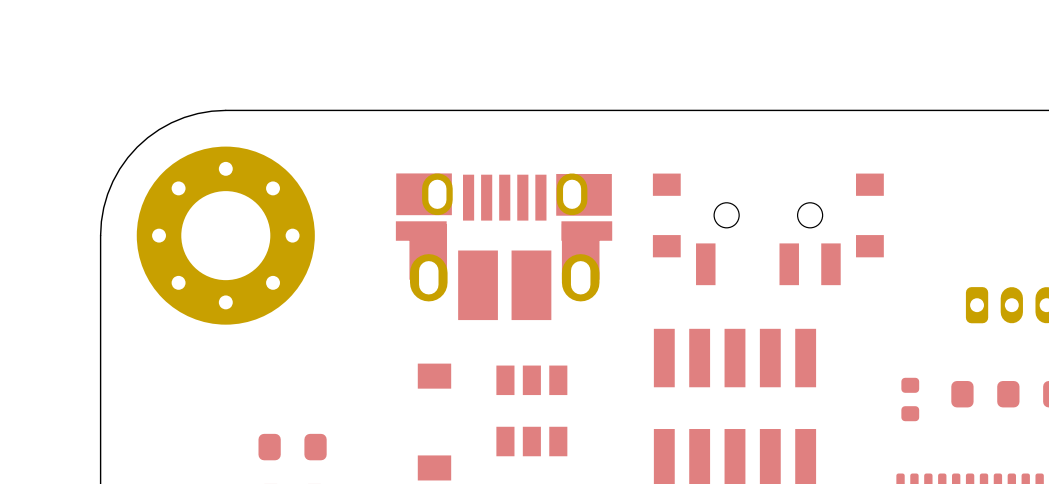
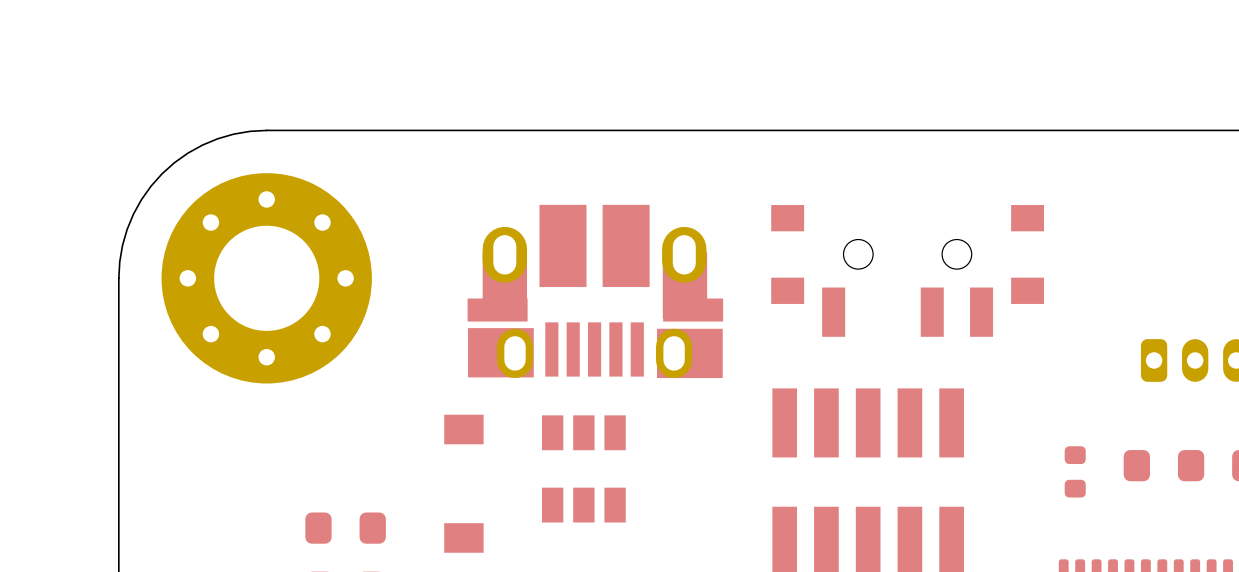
part rotation: 0° (504, 246) -> 180° (595, 291)
part position: (531, 410) -> (583, 468)
part position: (434, 422) -> (463, 483)

